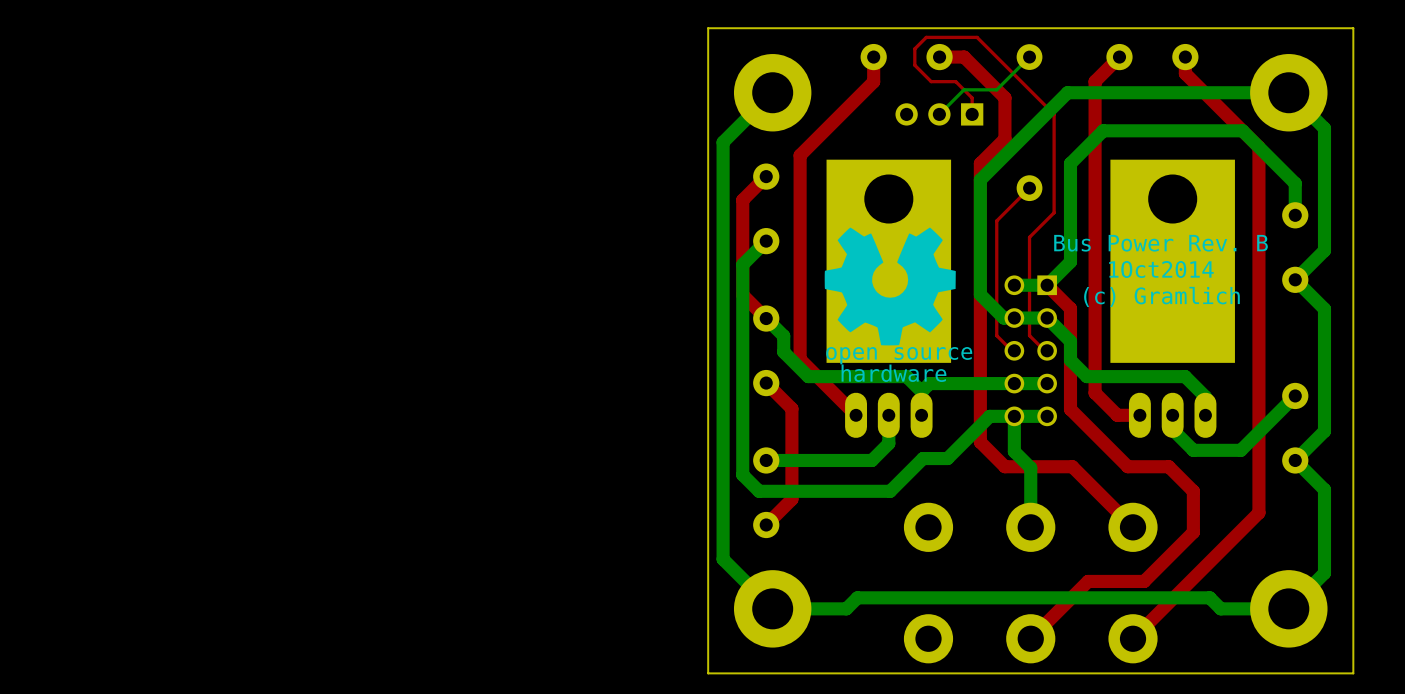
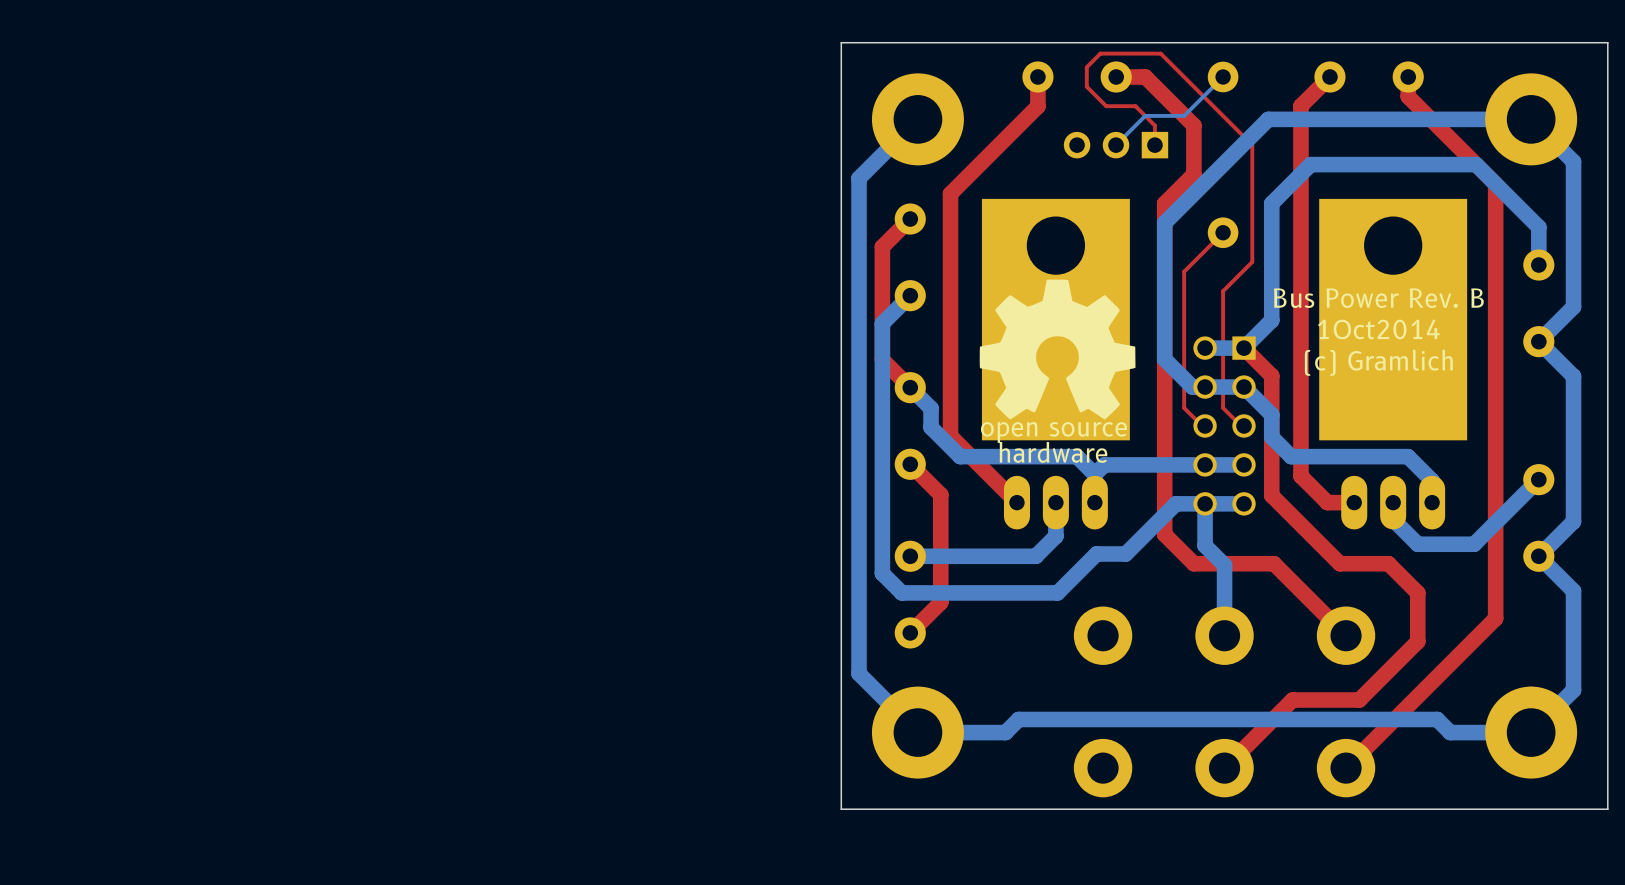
drawing shape: [824, 227, 956, 346] -> [979, 279, 1136, 420]

